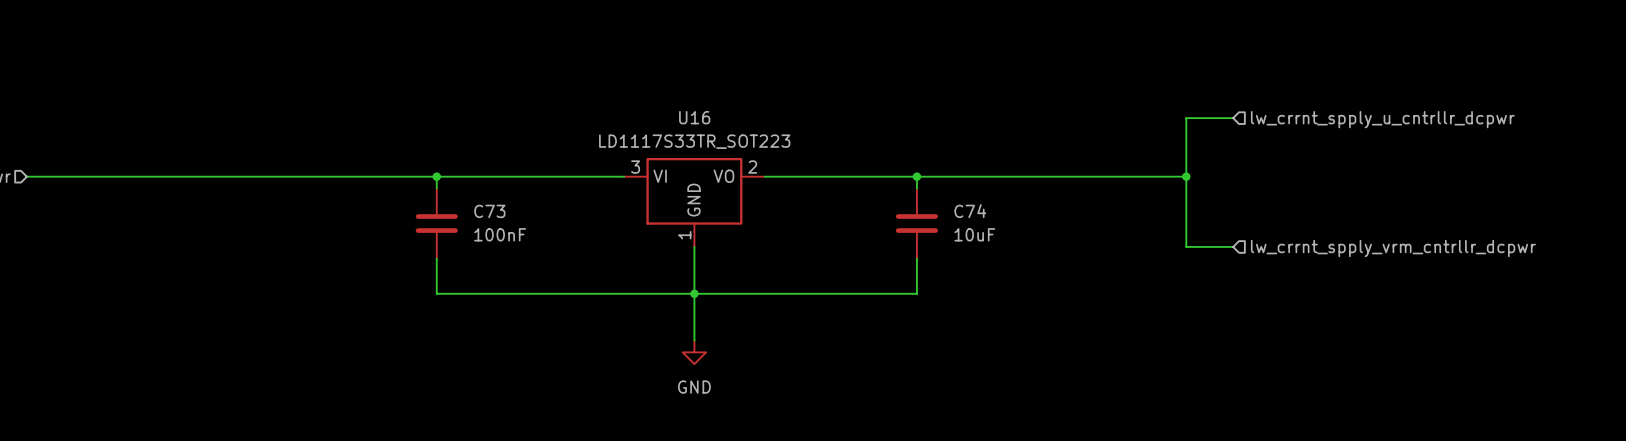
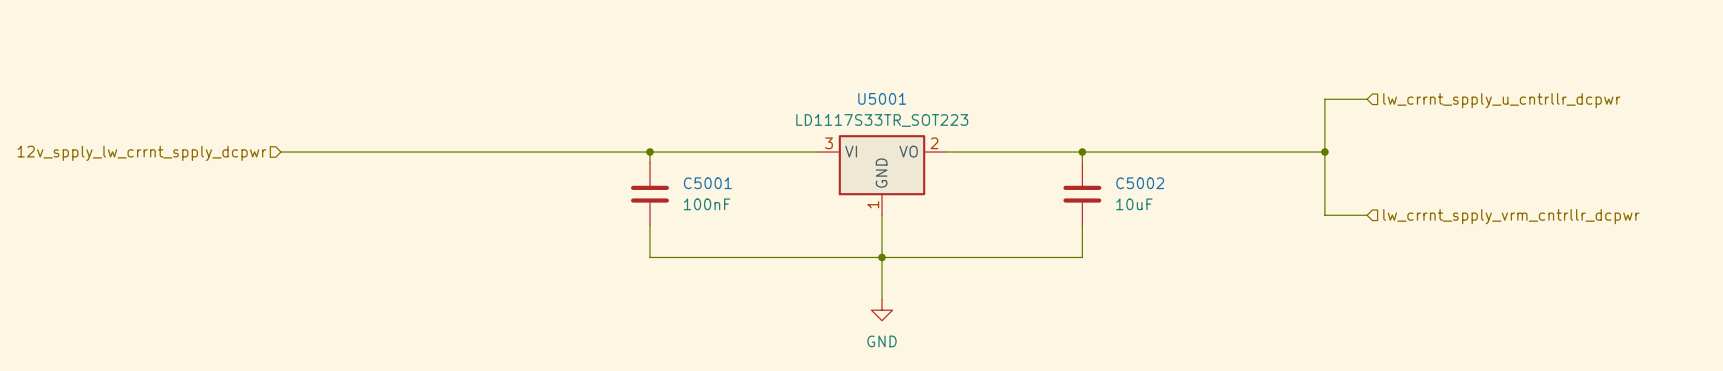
U16 name: U16 (694, 117) -> U5001 (882, 98)
C73 name: C73 (489, 211) -> C5001 (707, 183)
C74 name: C74 (970, 211) -> C5002 (1140, 183)

